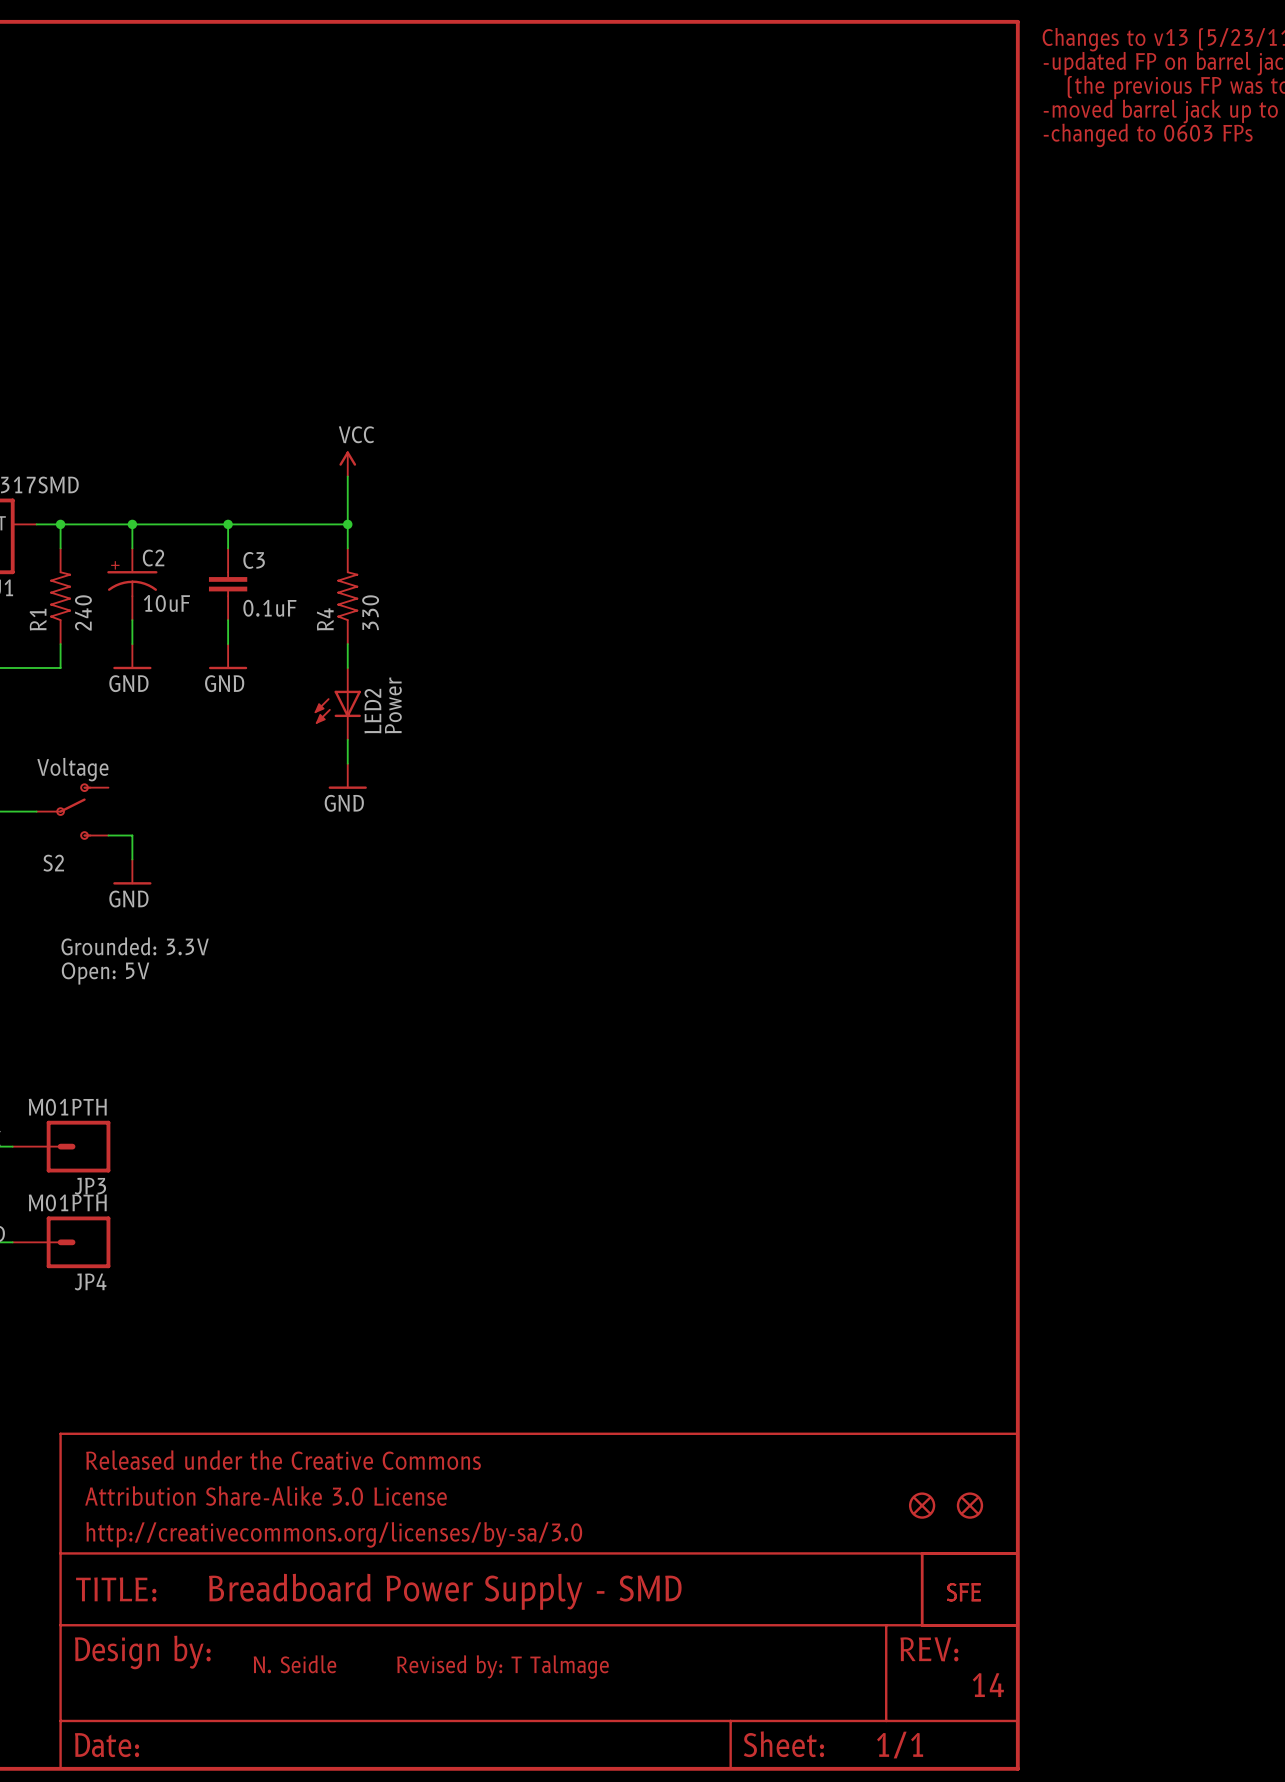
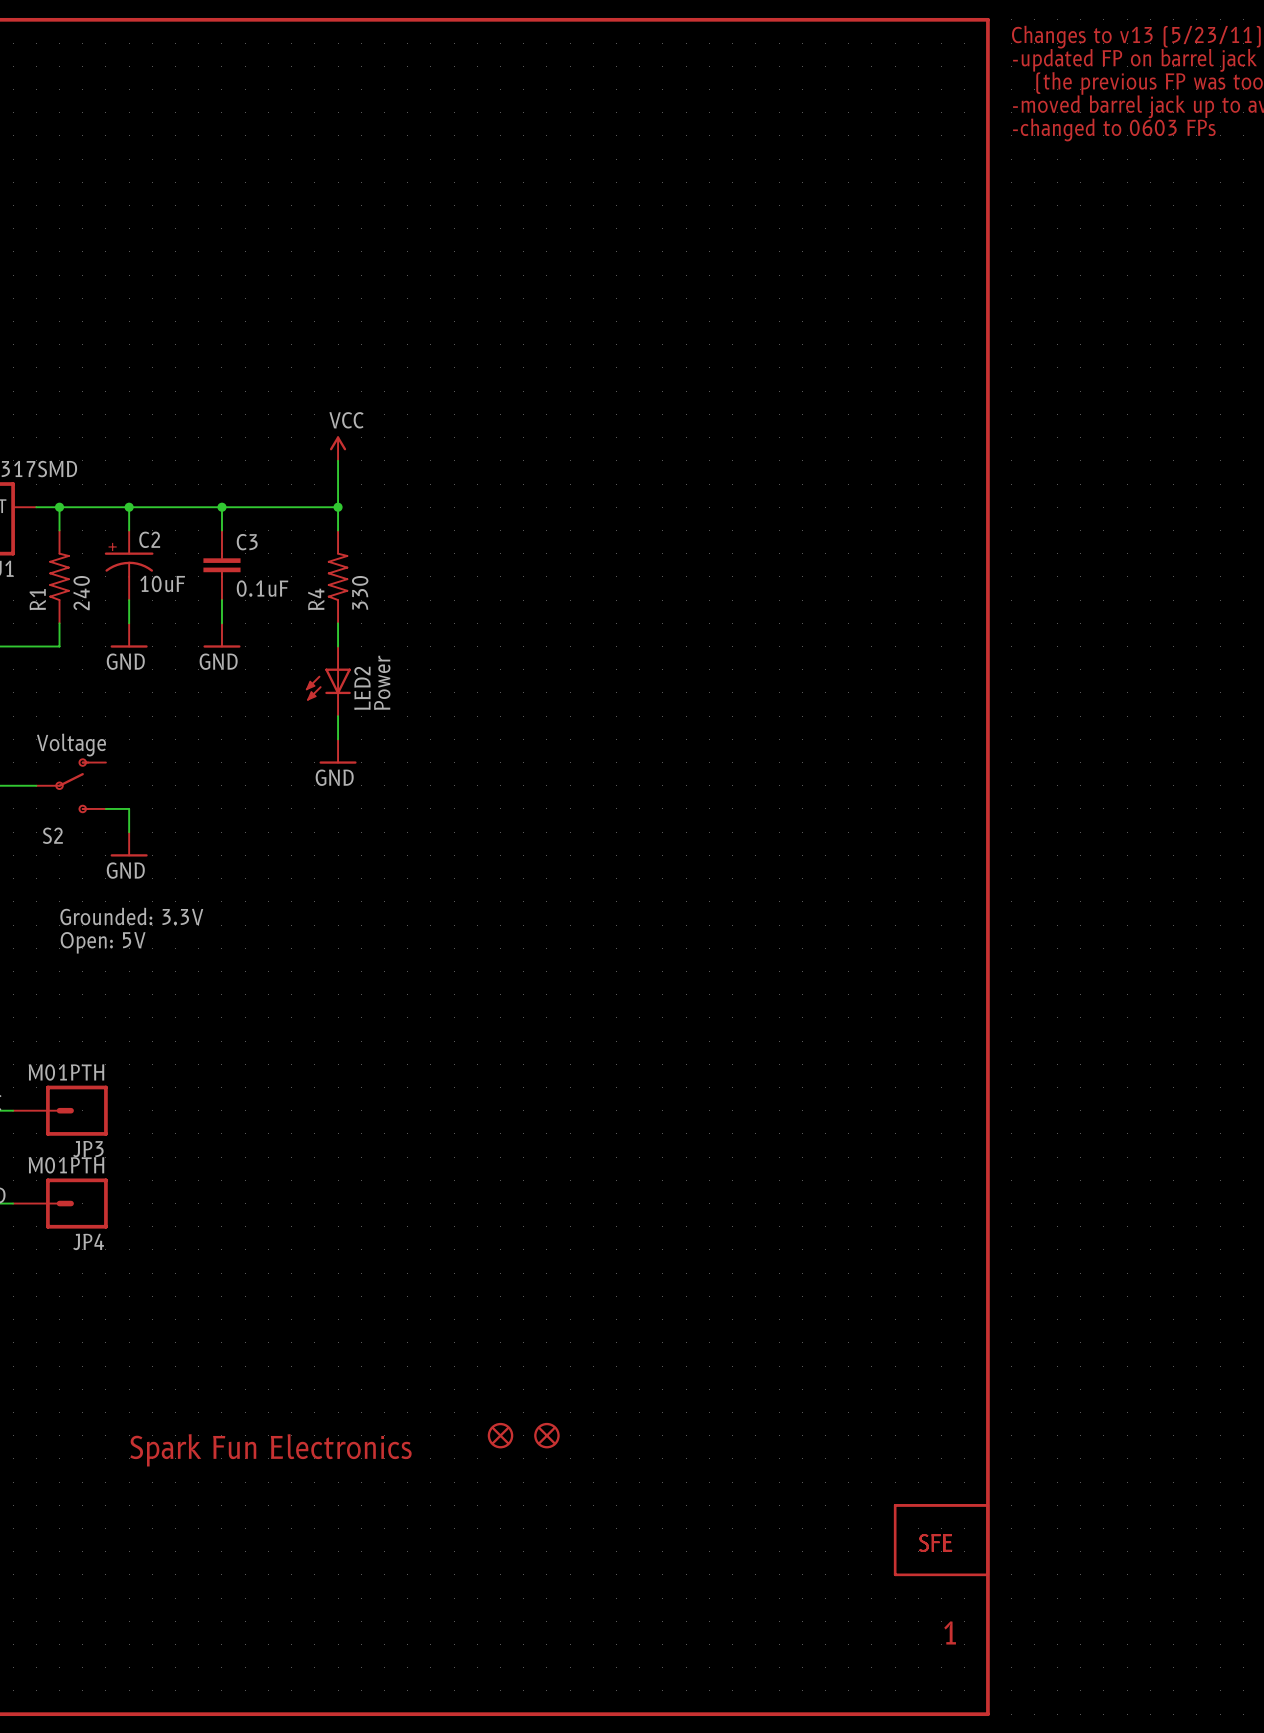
part: none -> (500, 1435)
part: none -> (546, 1435)
text: none -> Spark Fun Electronics (270, 1450)
part: (922, 1505) -> none
part: (969, 1505) -> none
part: (539, 1601) -> none
text: N. Seidle (294, 1664) -> none
text: Revised by: T Talmage (502, 1667) -> none
text: 14 (988, 1685) -> 1 (950, 1632)

